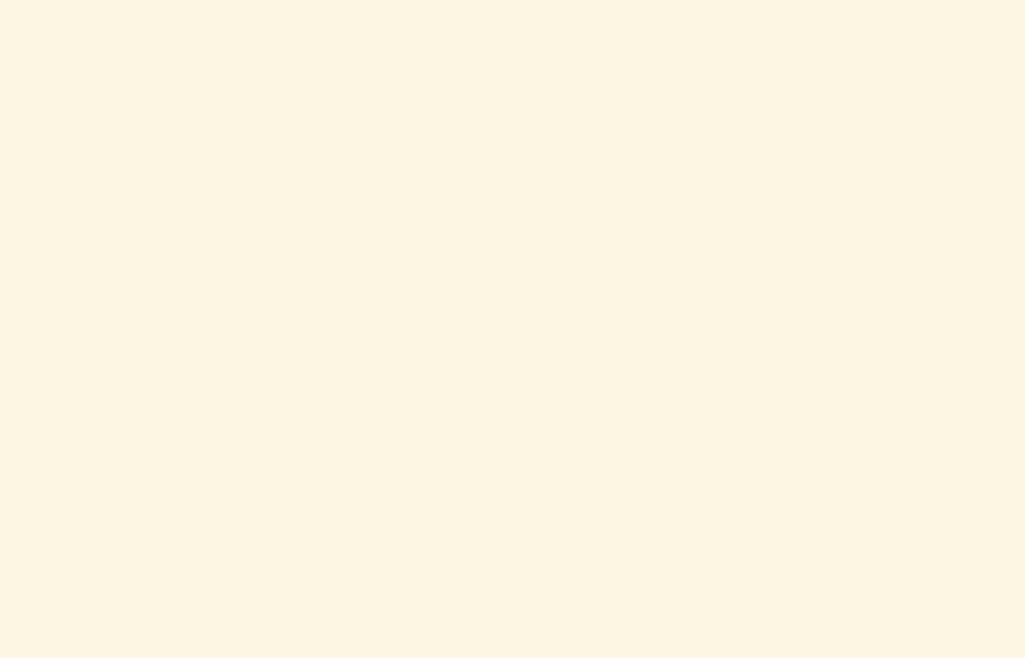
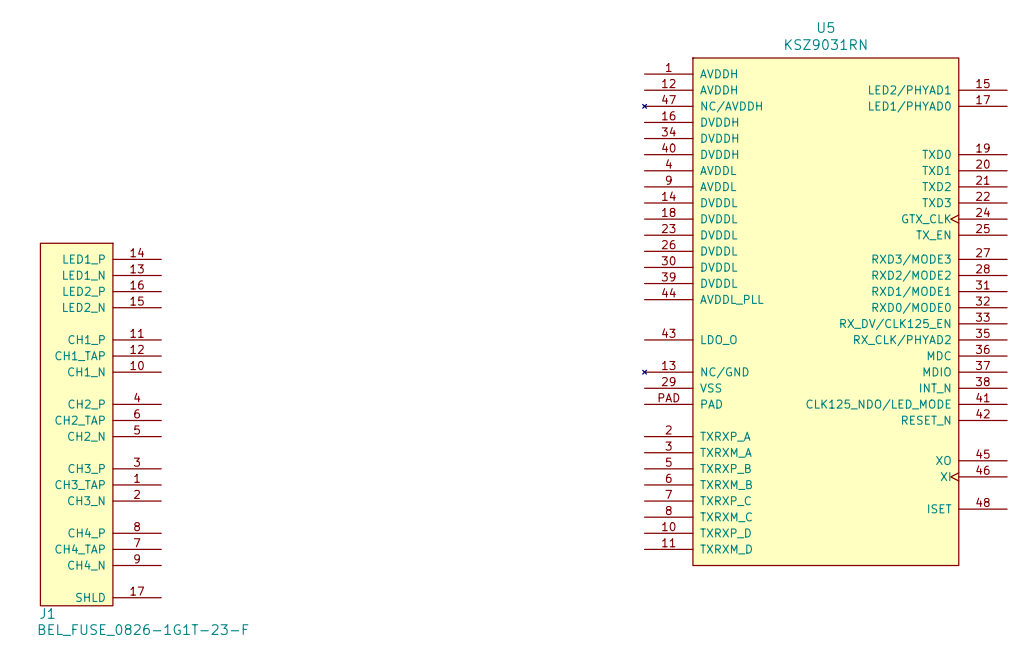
U5: none -> KSZ9031RN (824, 311)
J1: none -> BEL_FUSE_0826-1G1T-23-F (100, 424)

